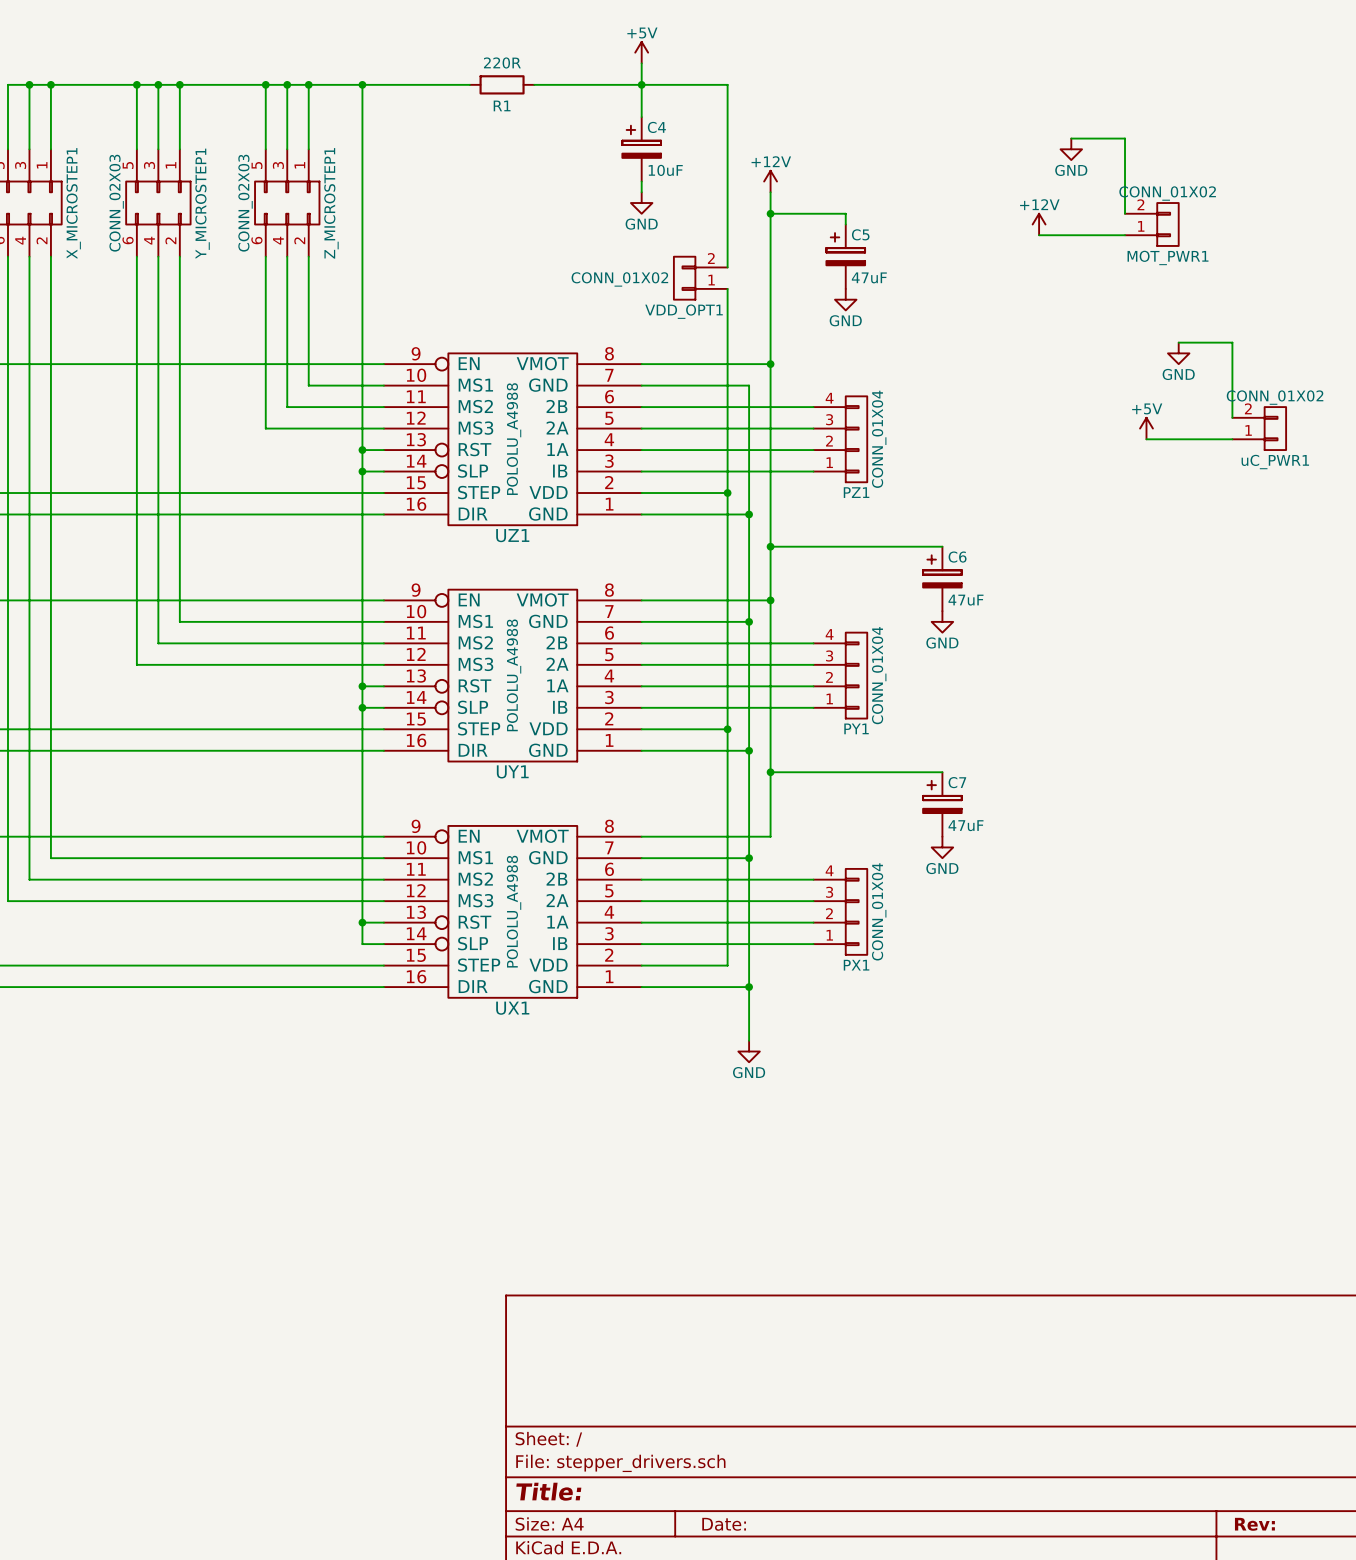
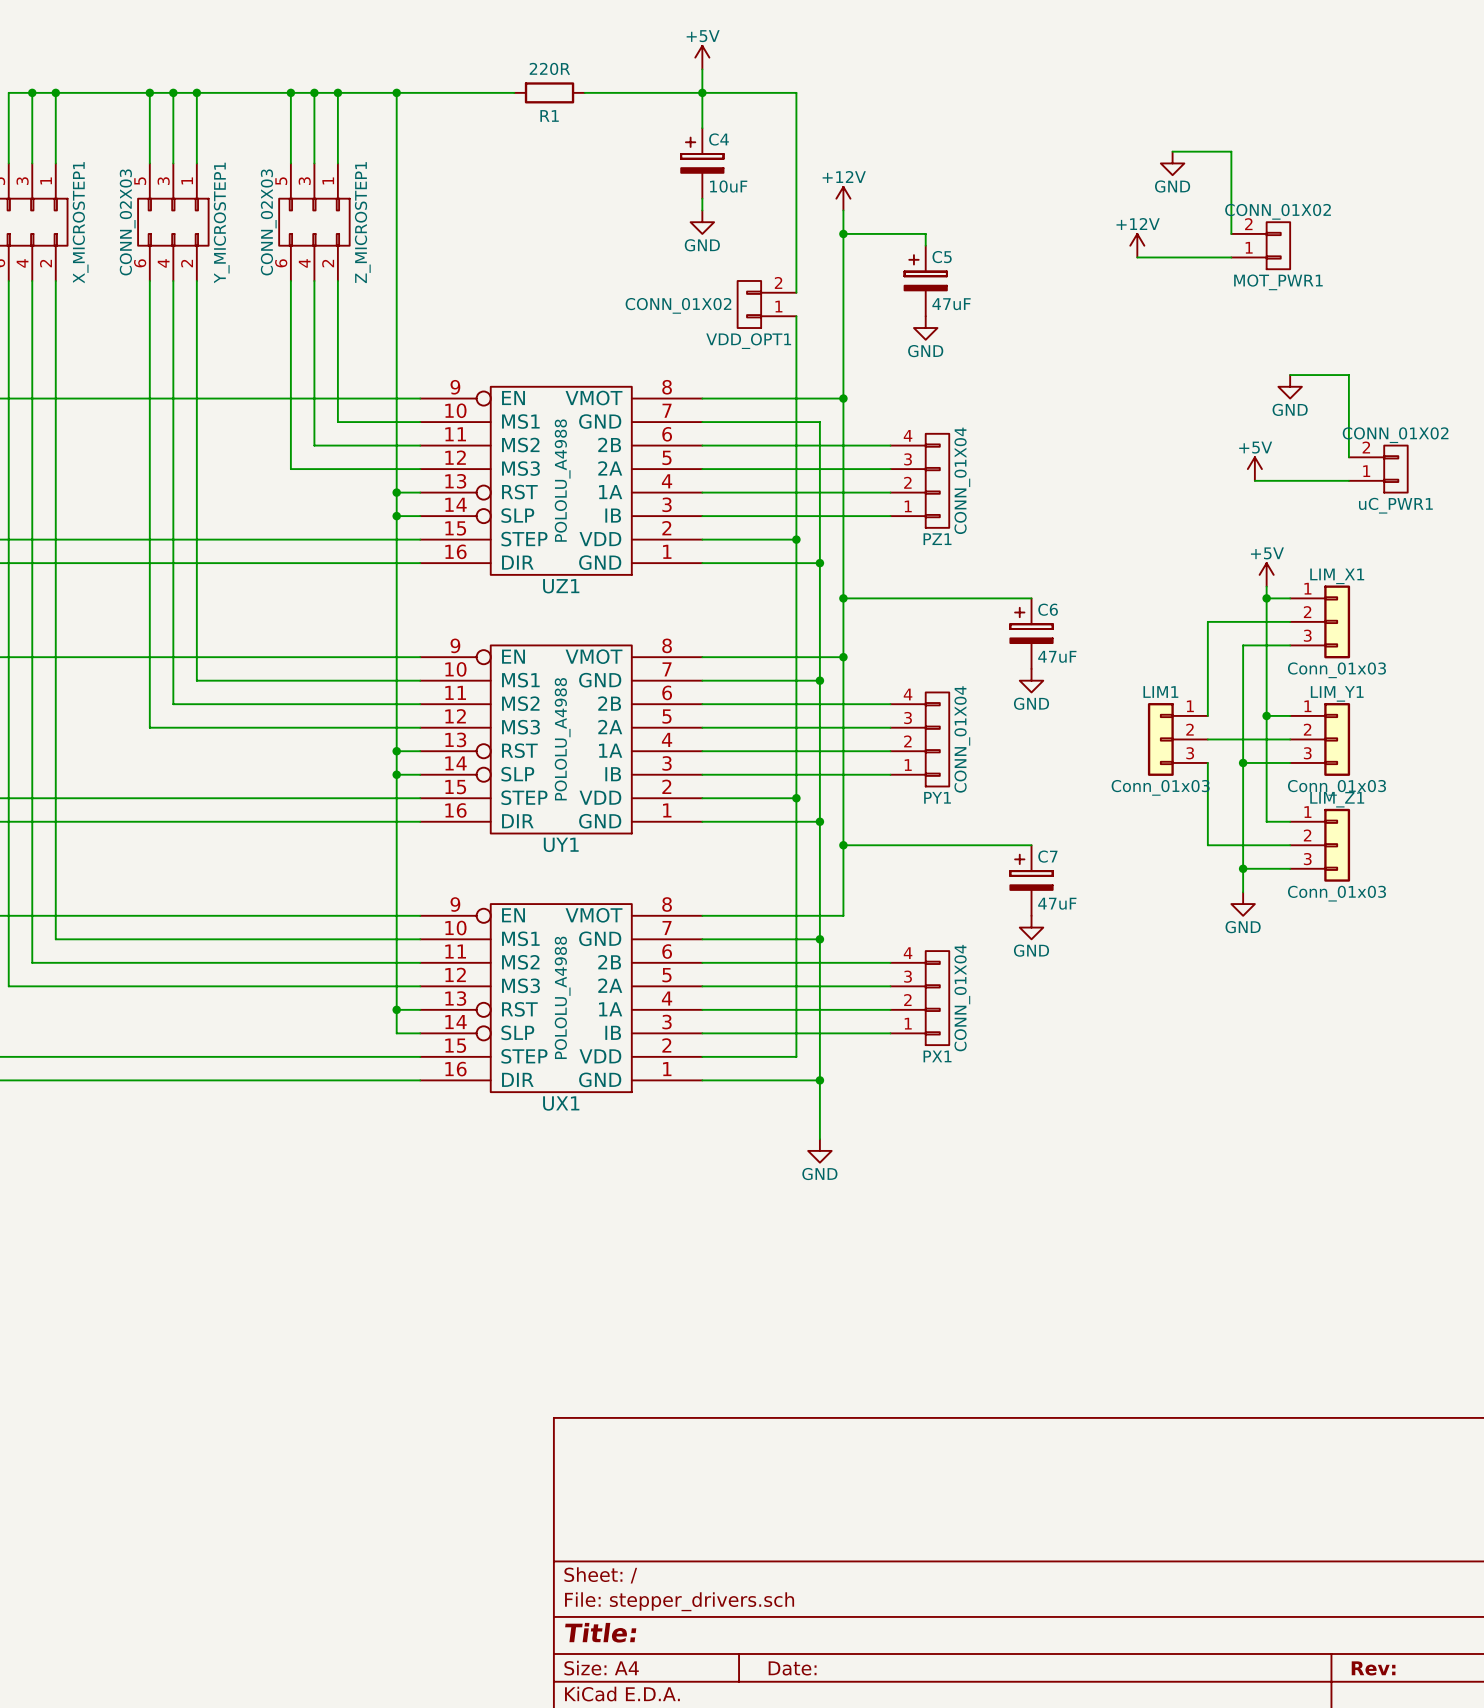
power symbol: none -> +5V (1266, 574)
wire: none -> (1266, 586) (1266, 821) (1290, 821)
wire: none -> (1266, 598) (1290, 598)
junction: none -> (1266, 598)
wire: none -> (1290, 621) (1207, 621) (1207, 715)
LIM_X1: none -> Conn_01x03 (1320, 621)
wire: none -> (1290, 645) (1243, 645) (1243, 892)
wire: none -> (1266, 715) (1290, 715)
junction: none -> (1266, 715)
LIM1: none -> Conn_01x03 (1177, 739)
wire: none -> (1207, 739) (1290, 739)
LIM_Y1: none -> Conn_01x03 (1320, 739)
wire: none -> (1207, 762) (1207, 845) (1290, 845)
wire: none -> (1243, 762) (1290, 762)
junction: none -> (1243, 762)
LIM_Z1: none -> Conn_01x03 (1320, 845)
wire: none -> (1243, 868) (1290, 868)
junction: none -> (1243, 868)
power symbol: none -> GND (1243, 904)

